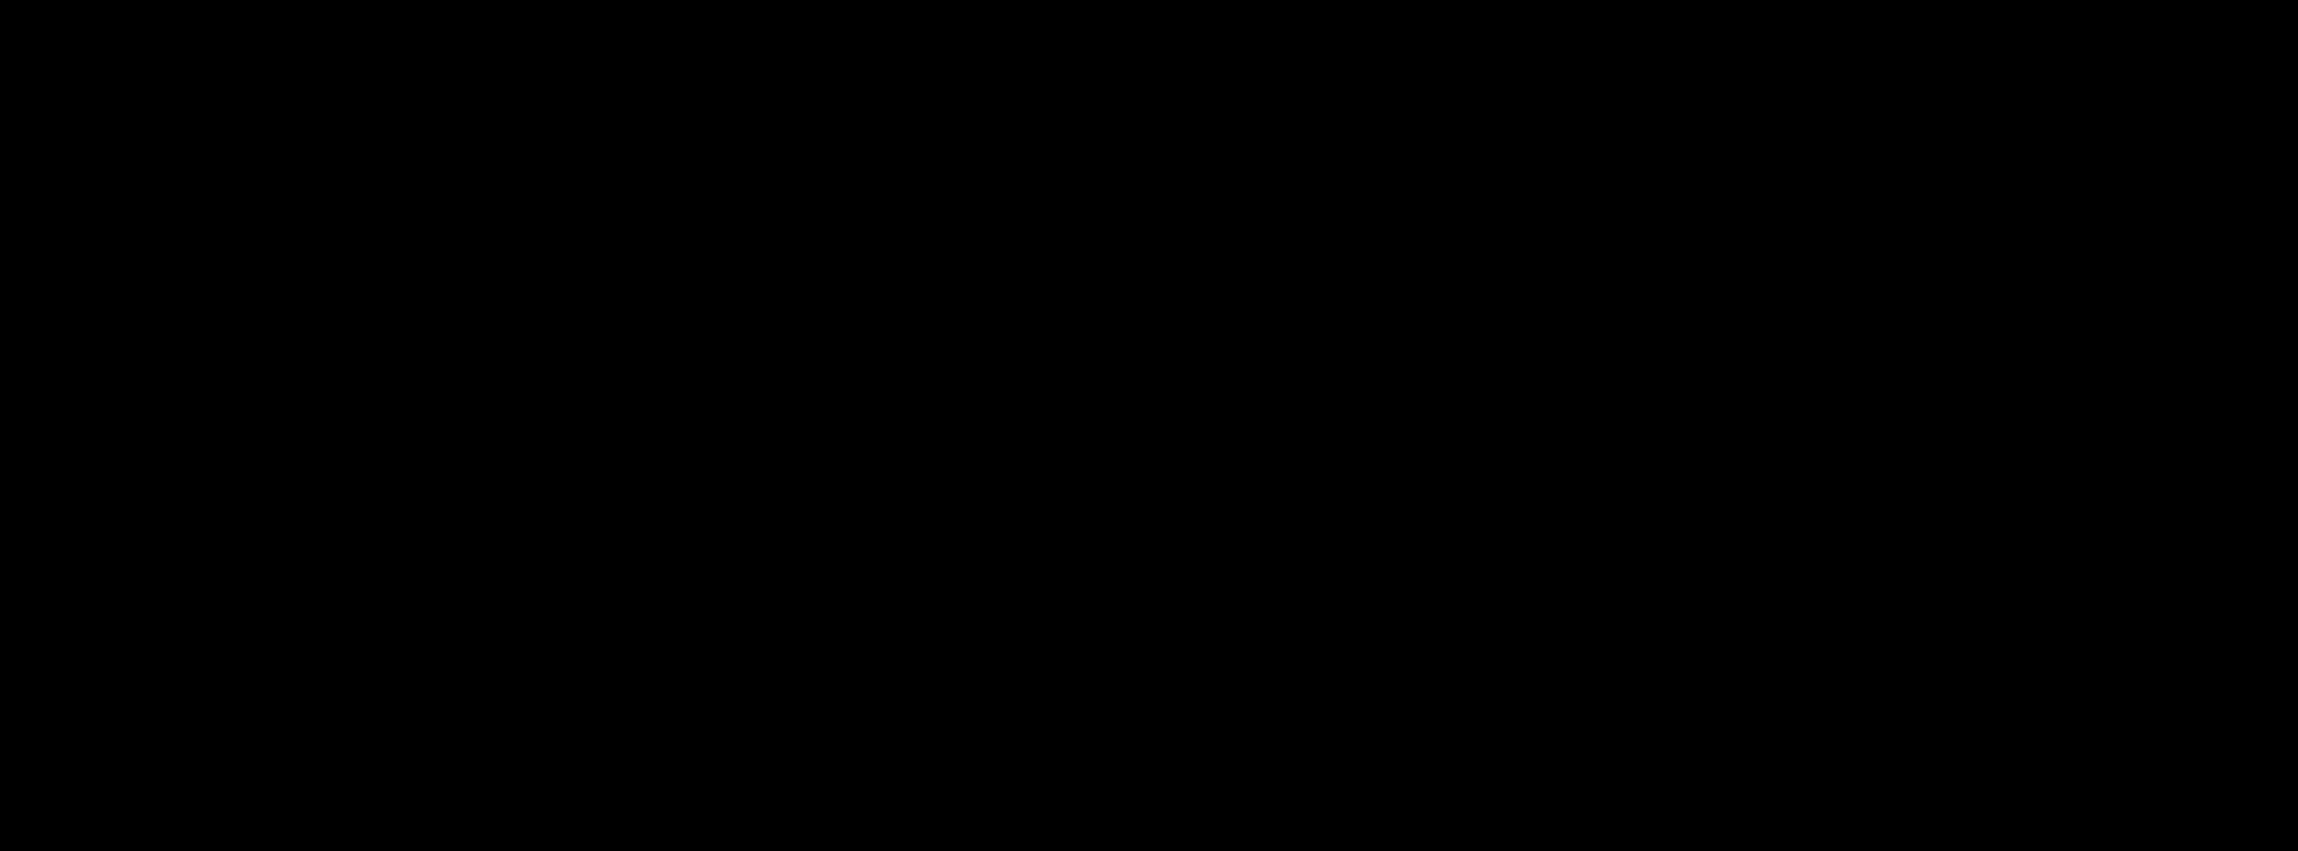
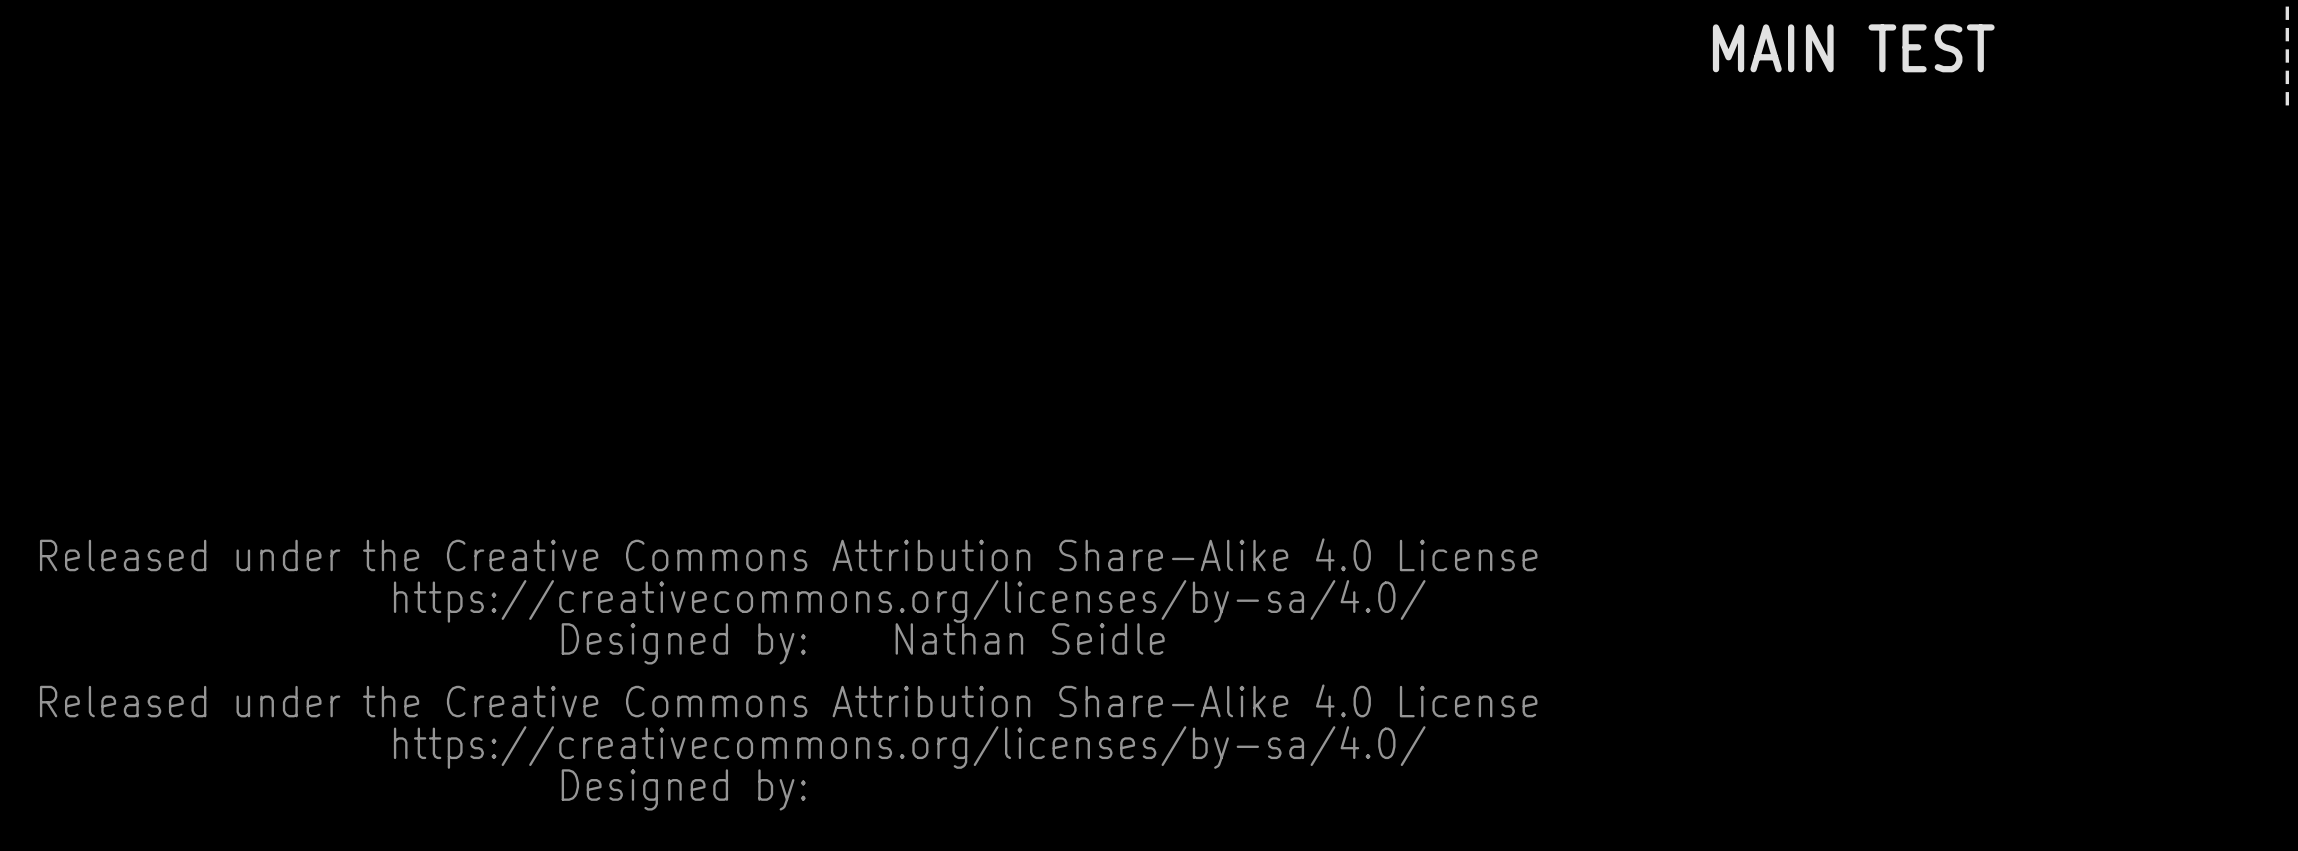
line: none -> (2287, 6) (2287, 110)
text: none -> MAIN TEST (1853, 48)
drawing: none -> [39, 538, 1538, 811]
text: none -> Nathan Seidle (1030, 638)

